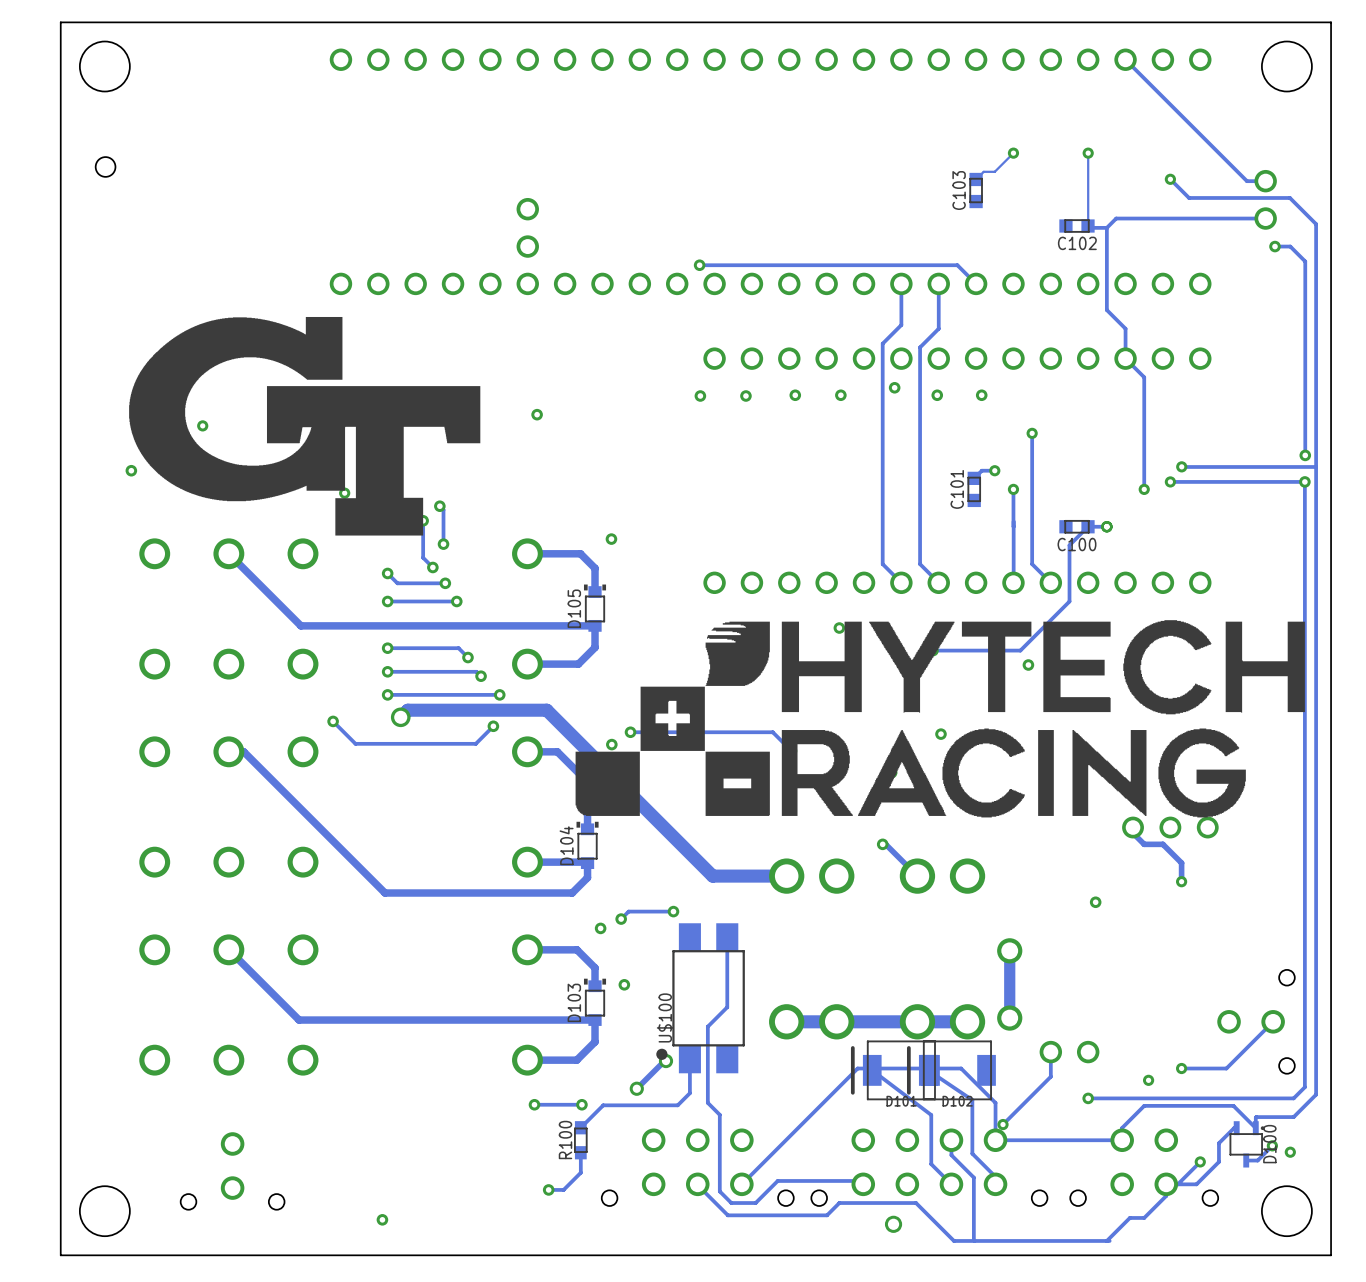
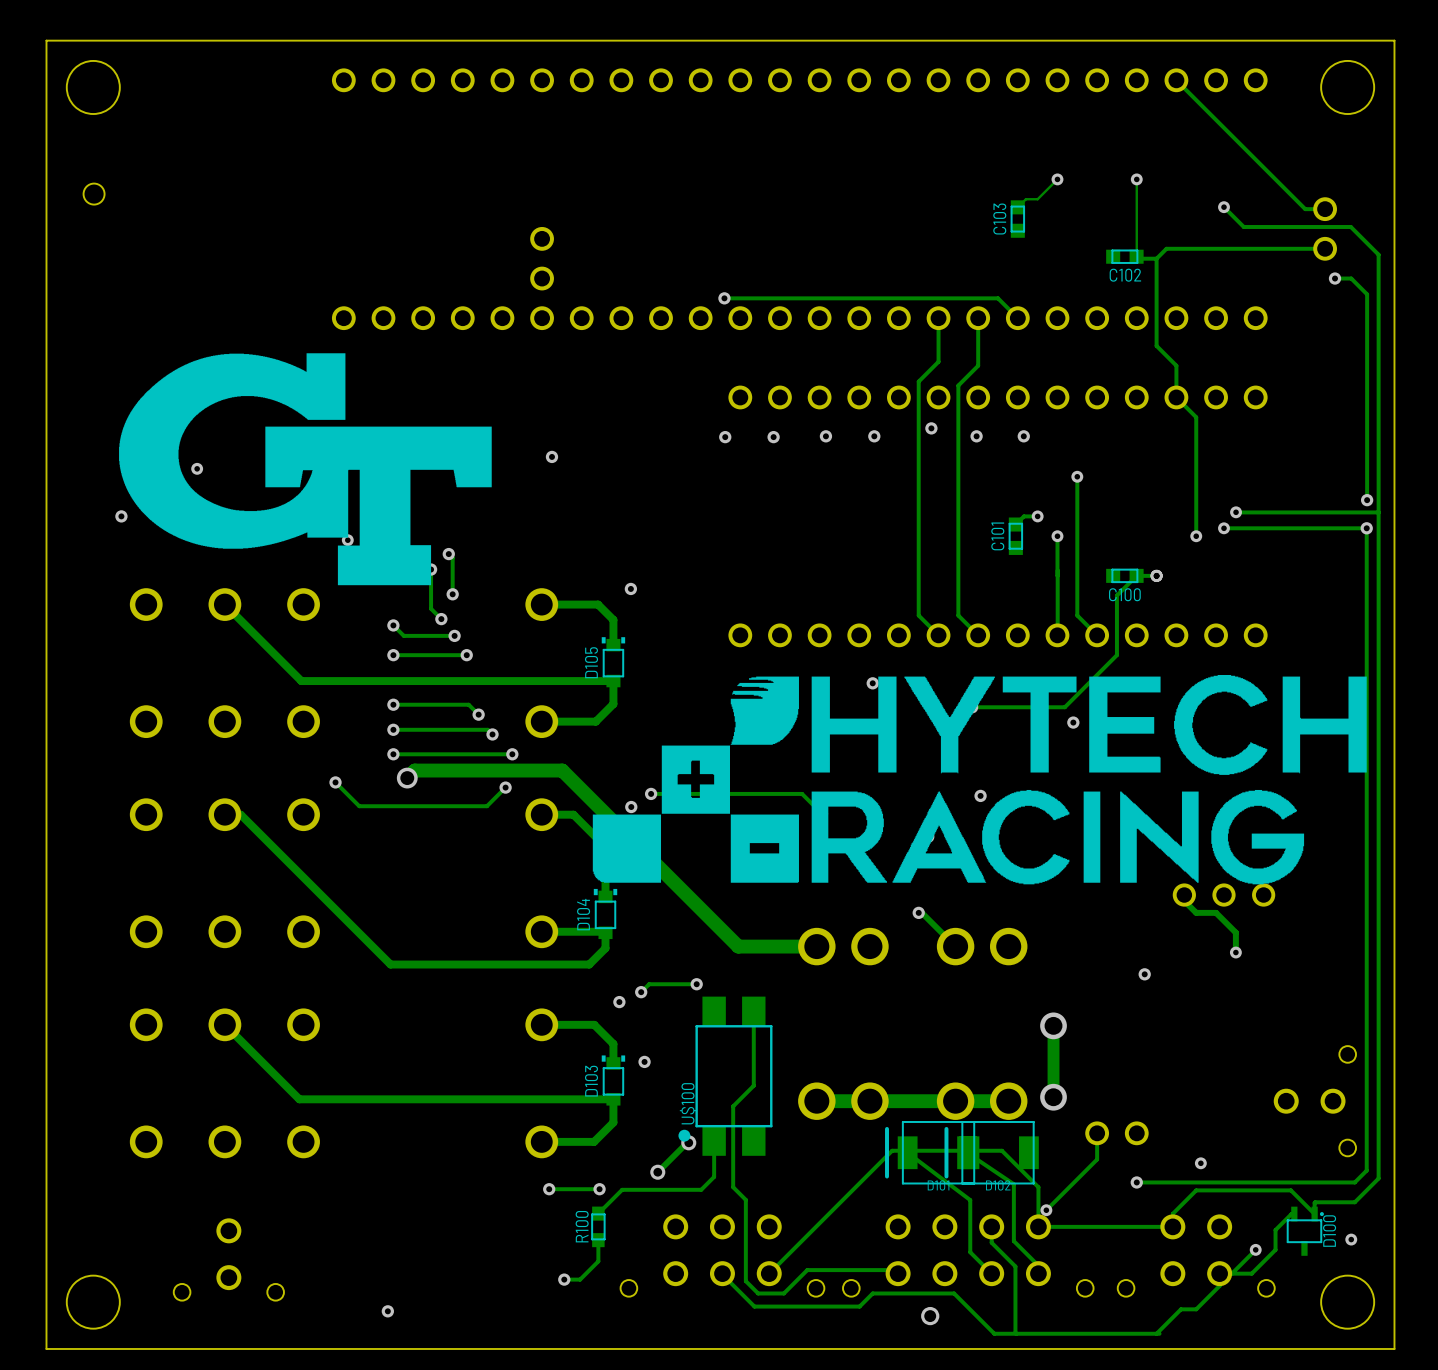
track: (1273, 1021) (1226, 1068) (1181, 1068) -> none
via: (1181, 1068) -> none
track: (1272, 1145) (1257, 1160) (1246, 1160) -> none
via: (1272, 1145) -> none

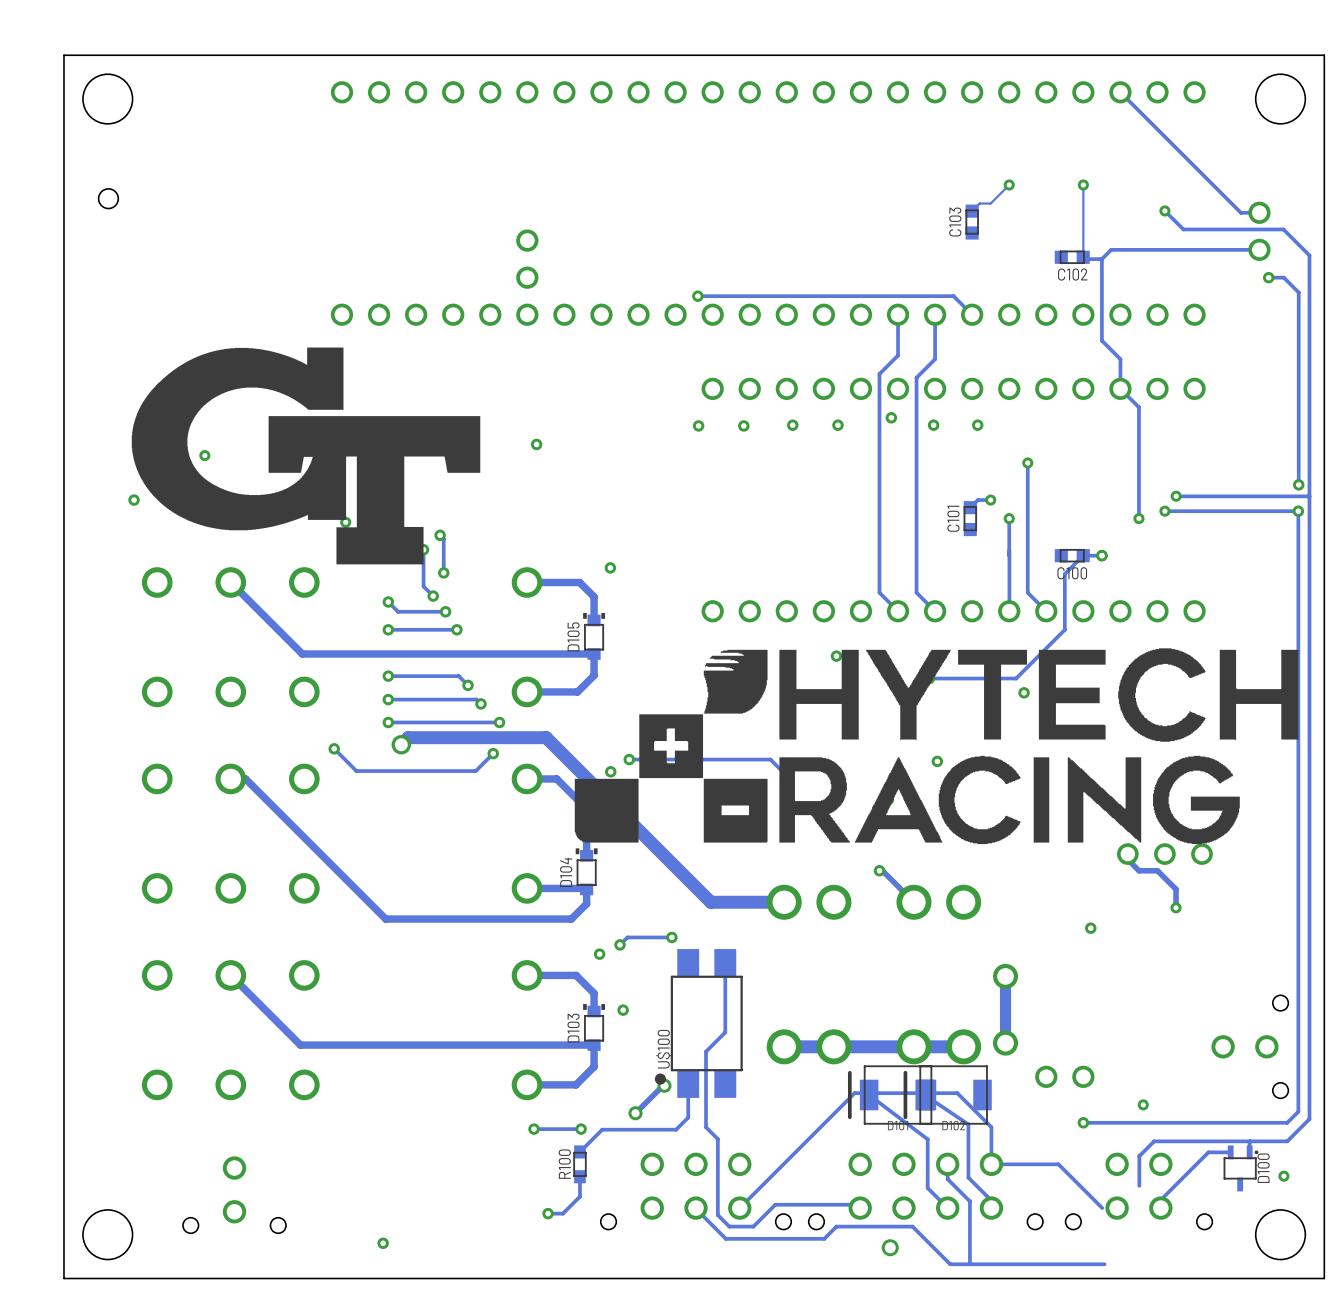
track: (1097, 1133) (1097, 1159) (1046, 1210) -> none
track: none -> (1250, 1141) (1154, 1141) (1139, 1156) (1139, 1185)
via: (1046, 1210) -> none
track: (1291, 1214) (1275, 1230) (1275, 1249) (1251, 1273) (1219, 1273) (1219, 1285) (1196, 1309) (1181, 1309) (1156, 1333) -> (1228, 1152) (1208, 1152) (1160, 1199)
track: (1314, 1214) (1290, 1190) (1196, 1190) (1172, 1213) (1172, 1226) (1110, 1226) -> (1102, 1208) (1058, 1164)
track: (1255, 1249) (1231, 1273) -> none
via: (1255, 1249) -> none

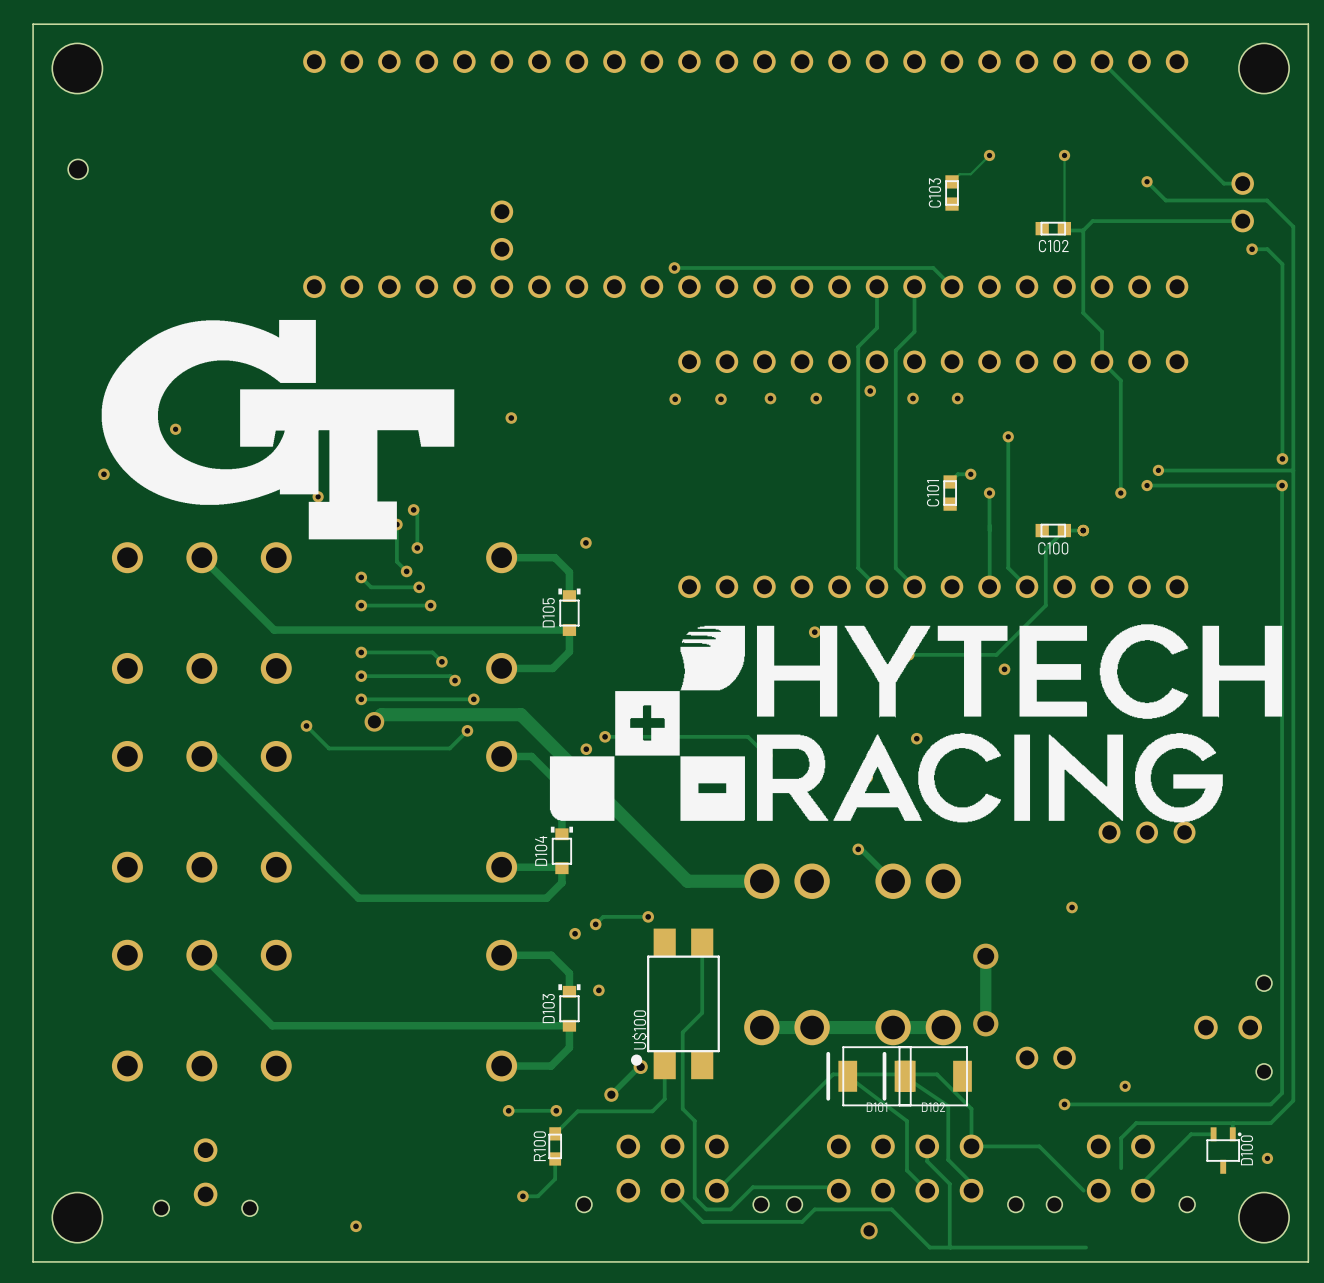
track: (1127, 854) (1127, 859) (1138, 870) (1157, 870) (1176, 889) (1176, 907) -> none
via: (1176, 907) -> none

